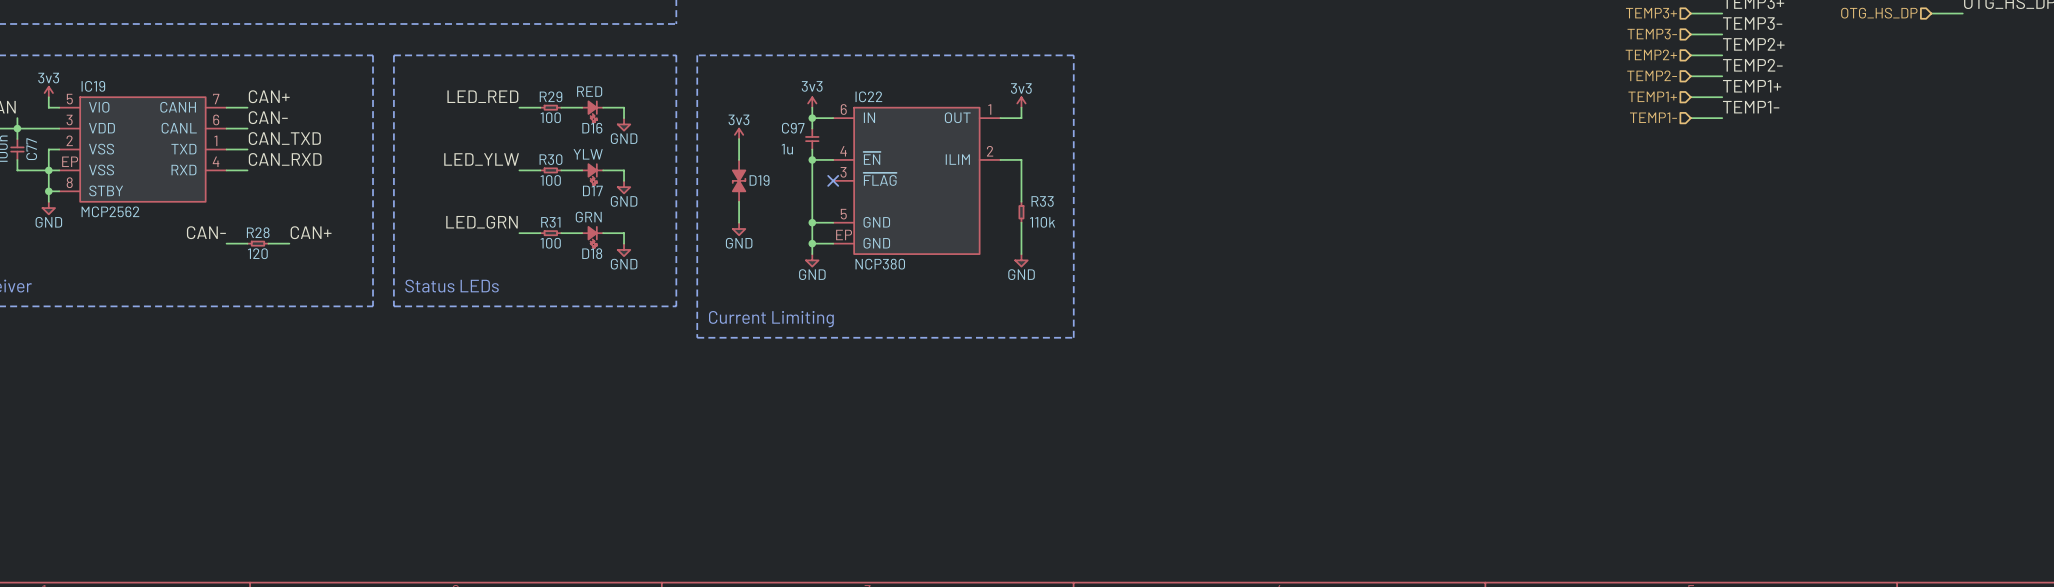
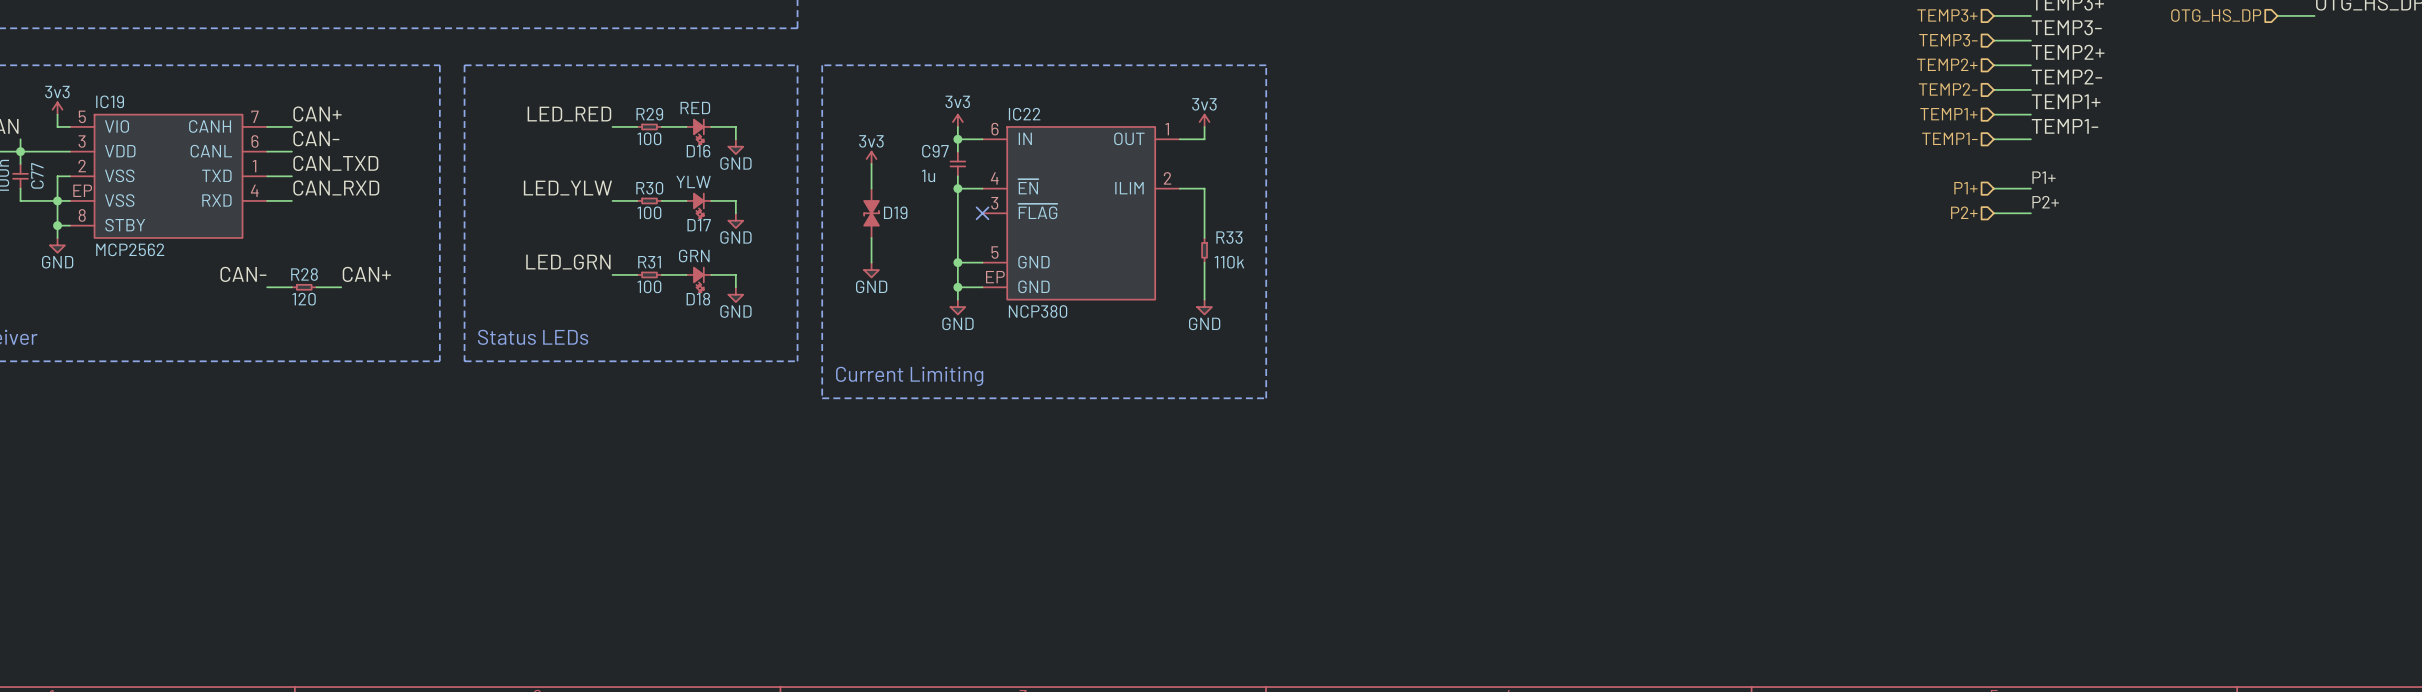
label: none -> P1+ (2044, 177)
hierarchical label: none -> P1+ (1965, 188)
wire: none -> (1993, 188) (2030, 188)
label: none -> P2+ (2045, 202)
hierarchical label: none -> P2+ (1964, 212)
wire: none -> (1993, 213) (2030, 213)

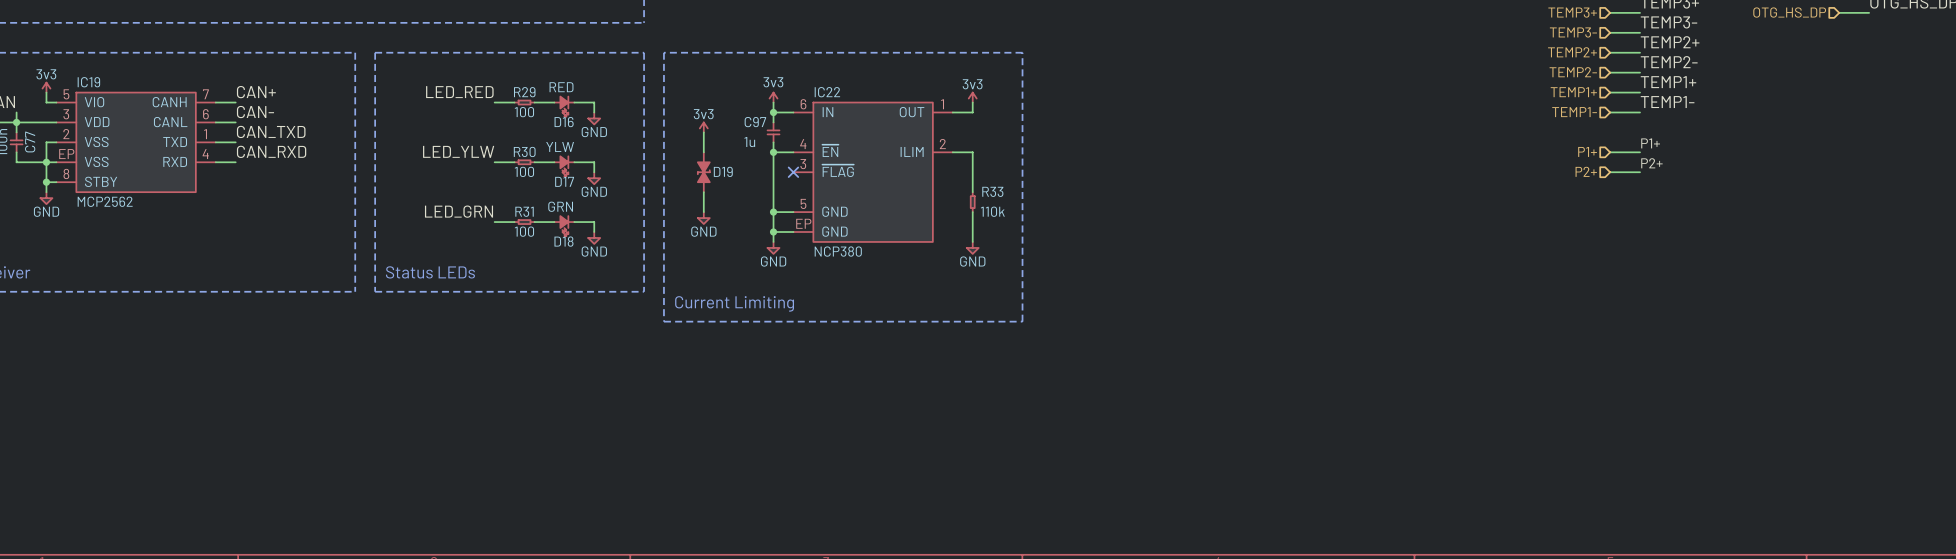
label: CAN- (243, 274) -> none
label: CAN+ (366, 274) -> none
wire: (267, 287) (291, 287) -> none
R28: 120 (304, 287) -> none
wire: (316, 287) (341, 287) -> none

